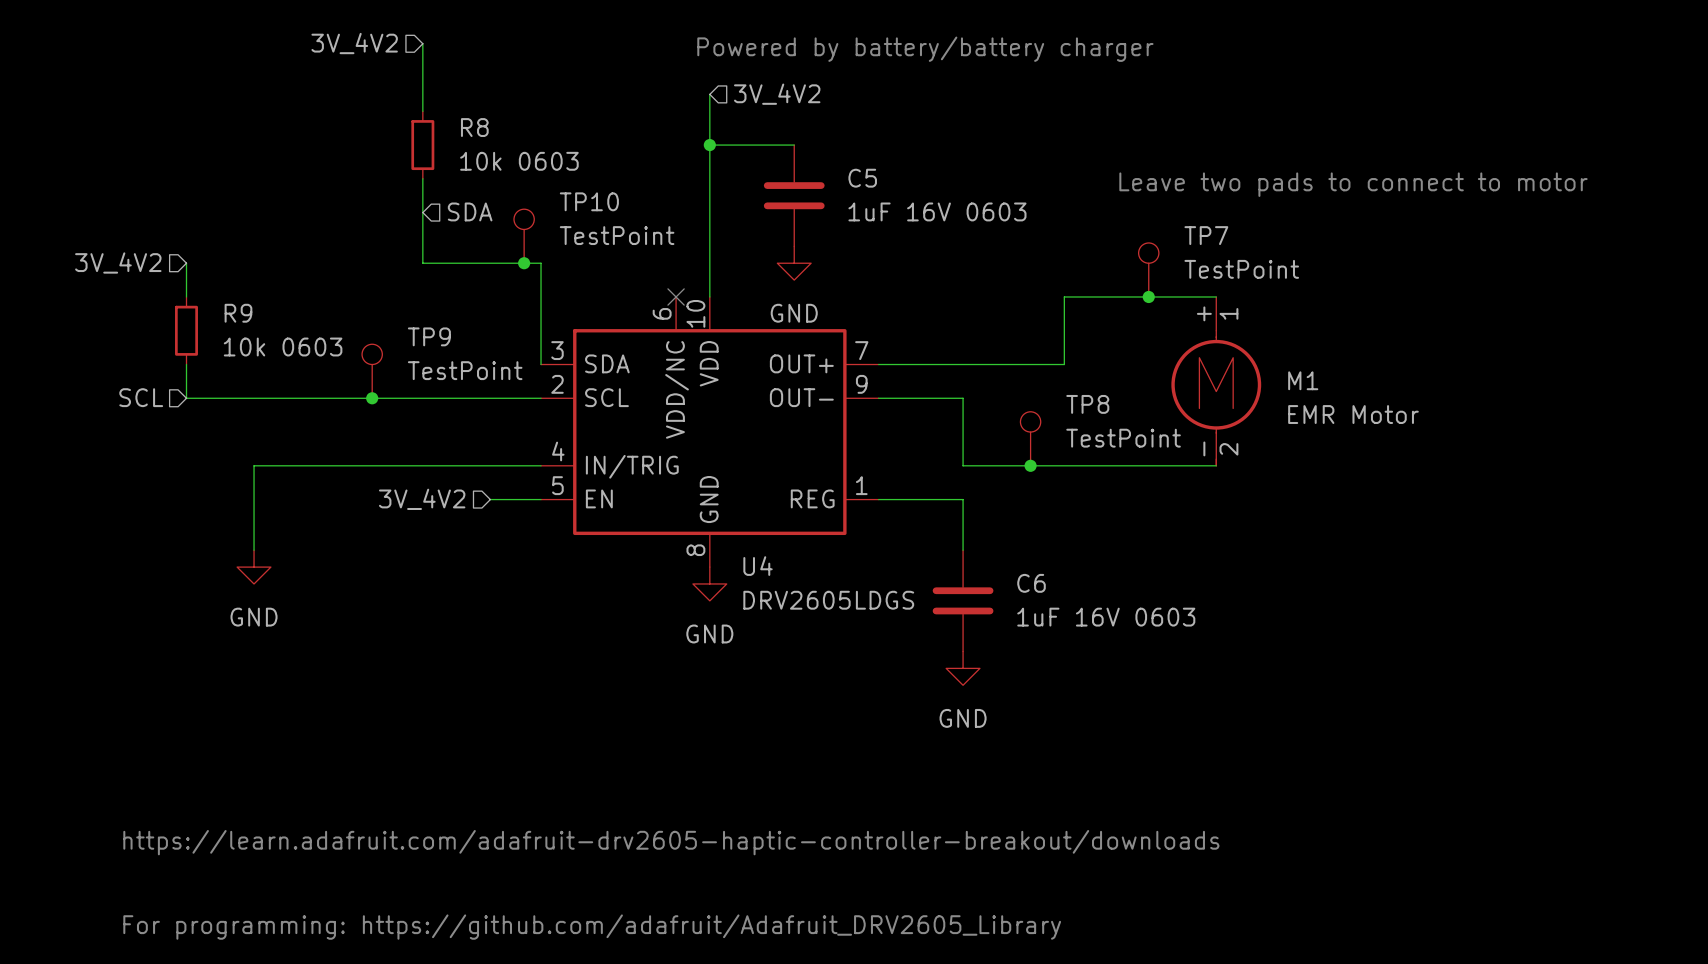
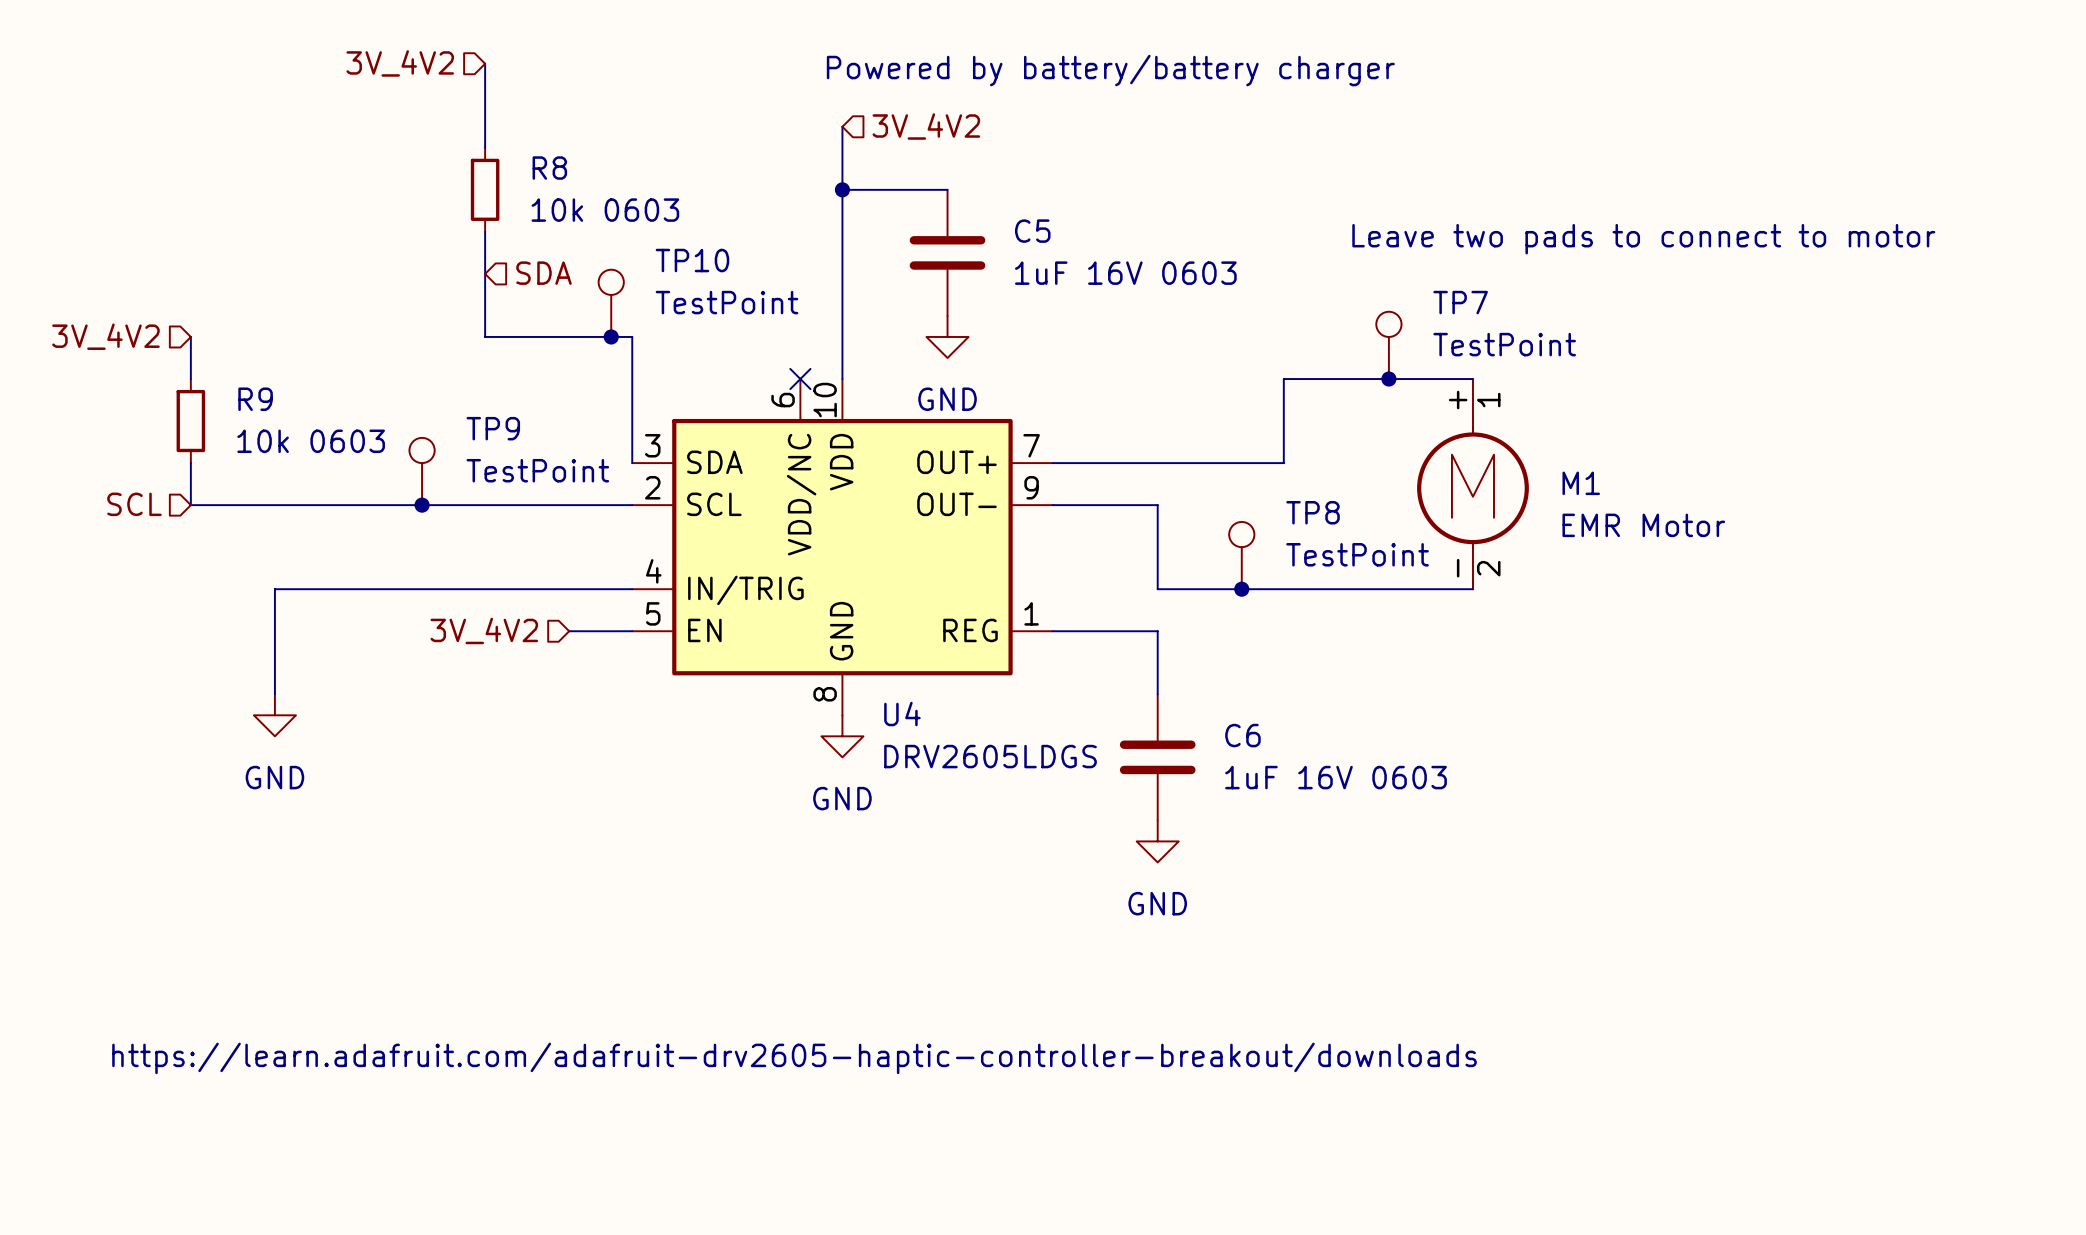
text: For programming: https://github.com/adafruit/Adafruit_DRV2605_Library (592, 927) -> none

